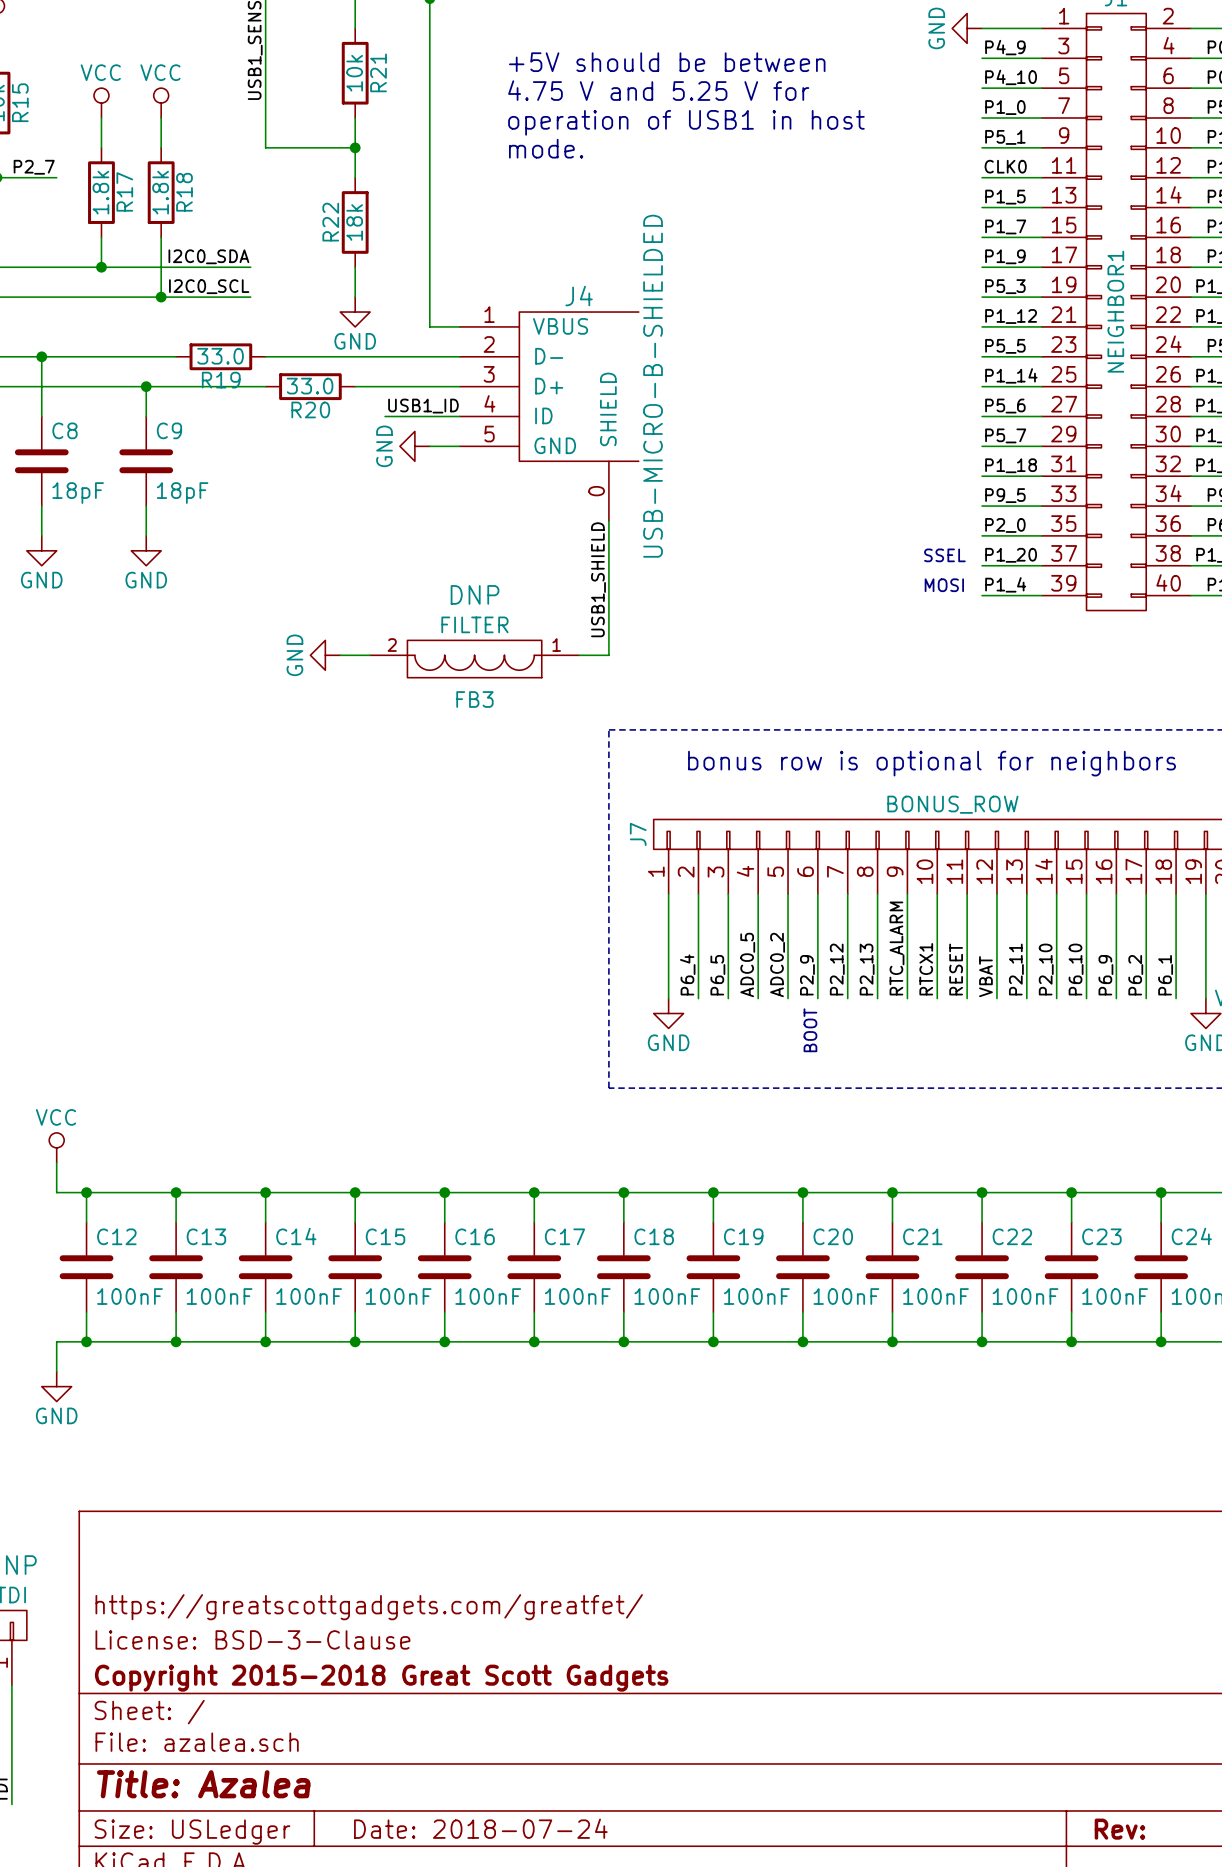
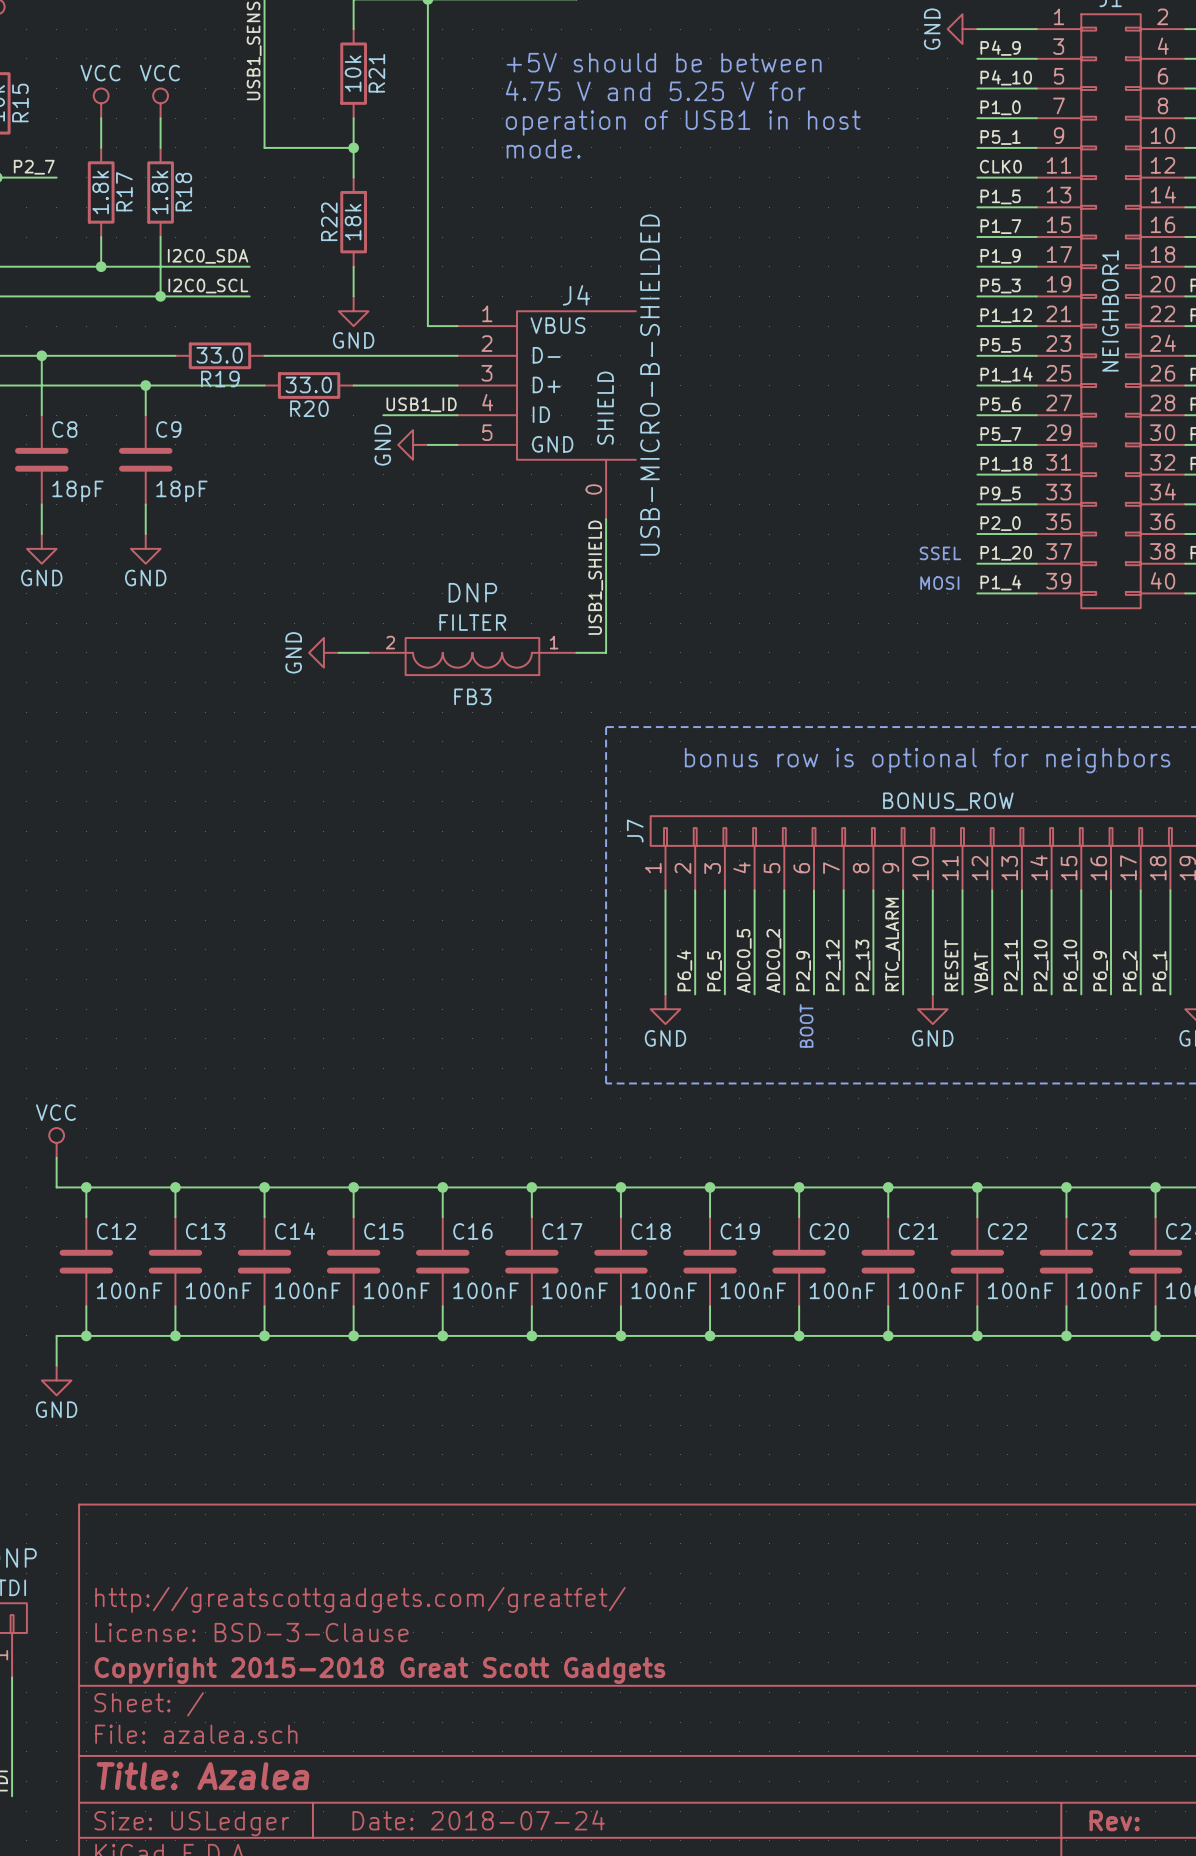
label: RTCX1 (926, 969) -> none
power symbol: none -> GND (932, 1009)
title block: https://greatscottgadgets.com/greatfet/ (369, 1607) -> http://greatscottgadgets.com/greatfet/ (360, 1599)

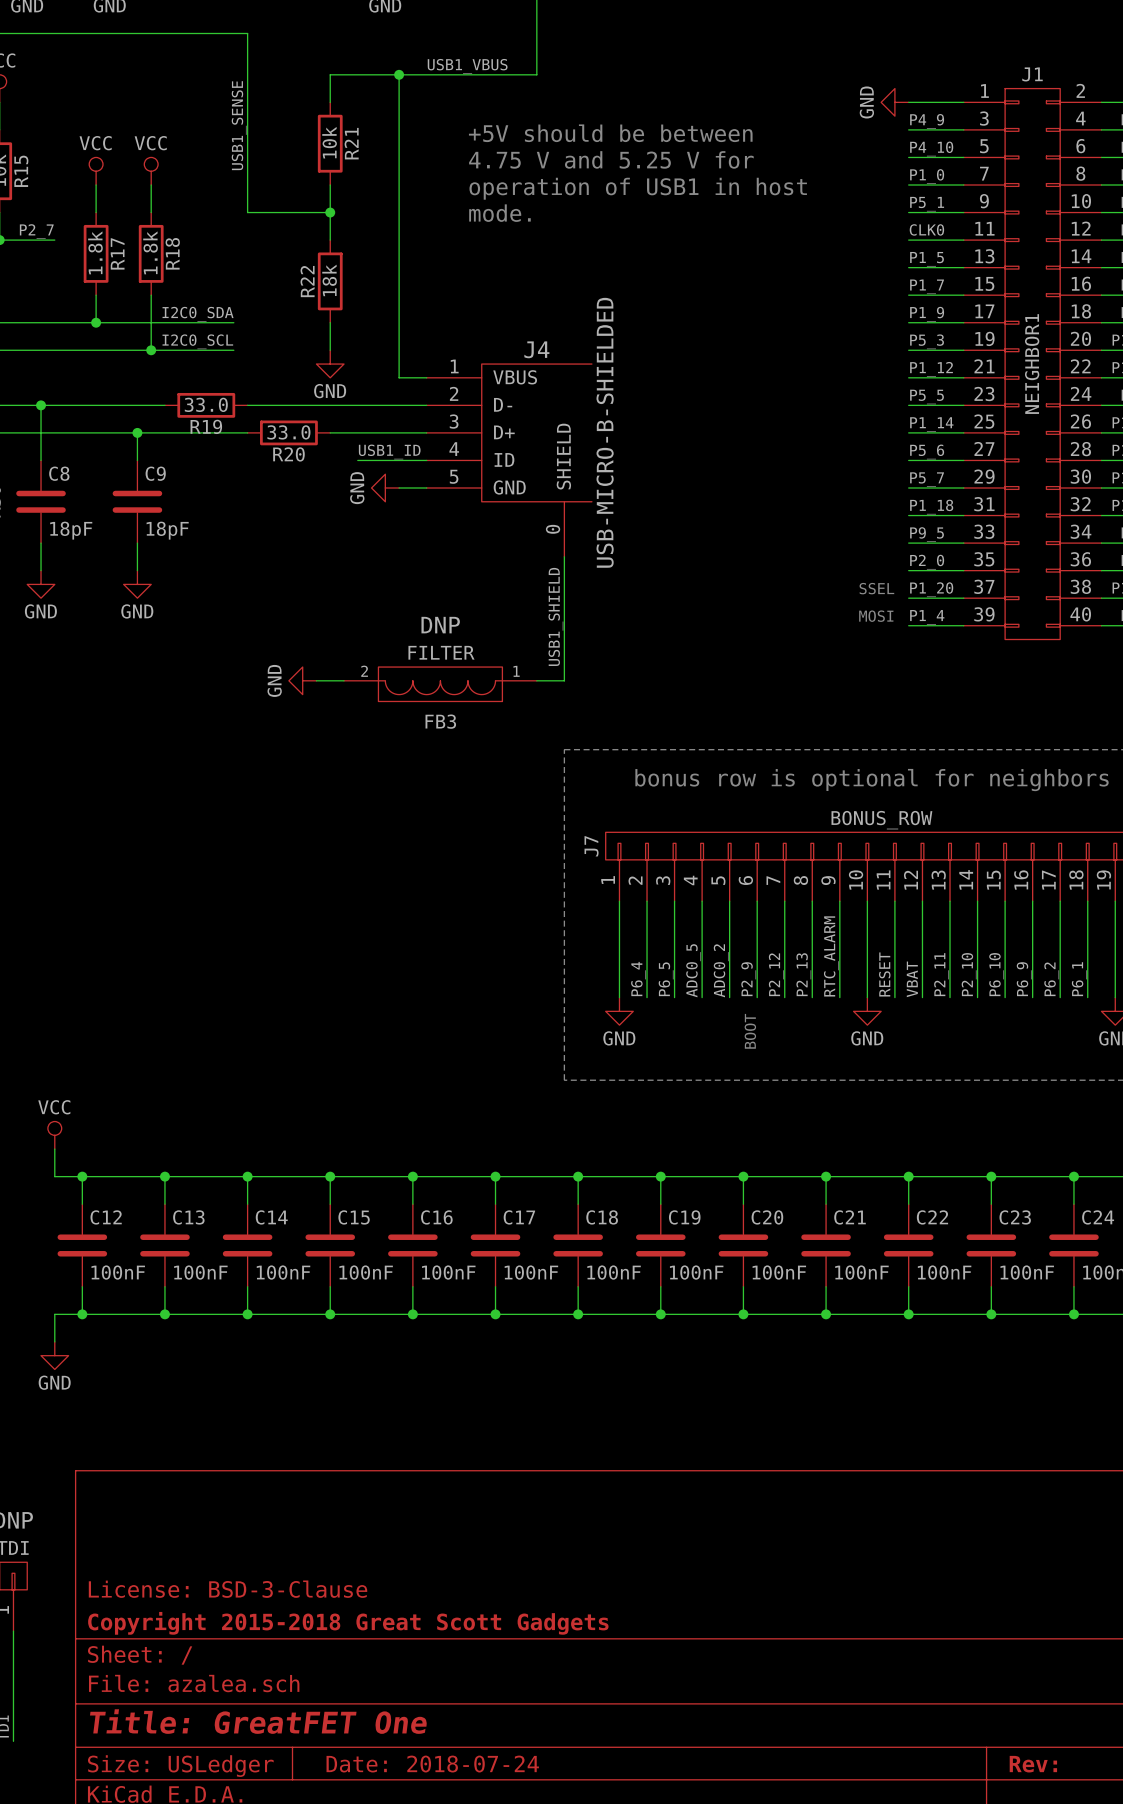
title block: http://greatscottgadgets.com/greatfet/ (360, 1599) -> none
title block: Title: Azalea (202, 1776) -> Title: GreatFET One (258, 1721)

